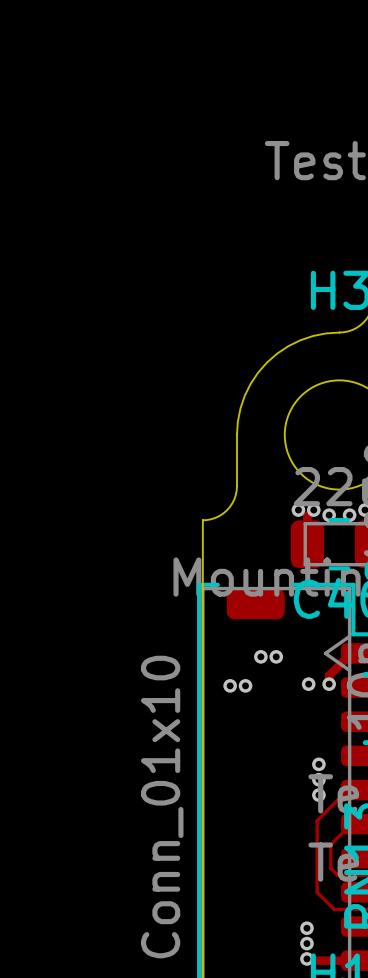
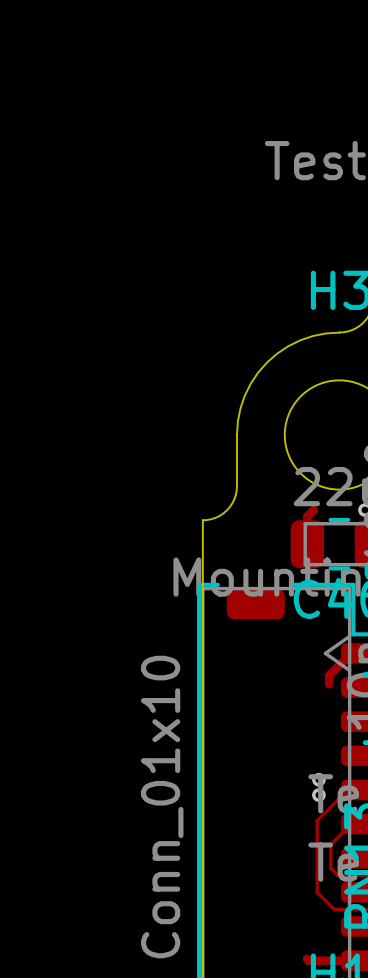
via: (298, 510) -> none
via: (313, 510) -> none
via: (329, 515) -> none
via: (349, 515) -> none
via: (260, 656) -> none
via: (276, 656) -> none
via: (308, 684) -> none
via: (329, 684) -> none
via: (230, 685) -> none
via: (245, 685) -> none
via: (318, 764) -> none
via: (306, 928) -> none
via: (306, 943) -> none
via: (306, 958) -> none

